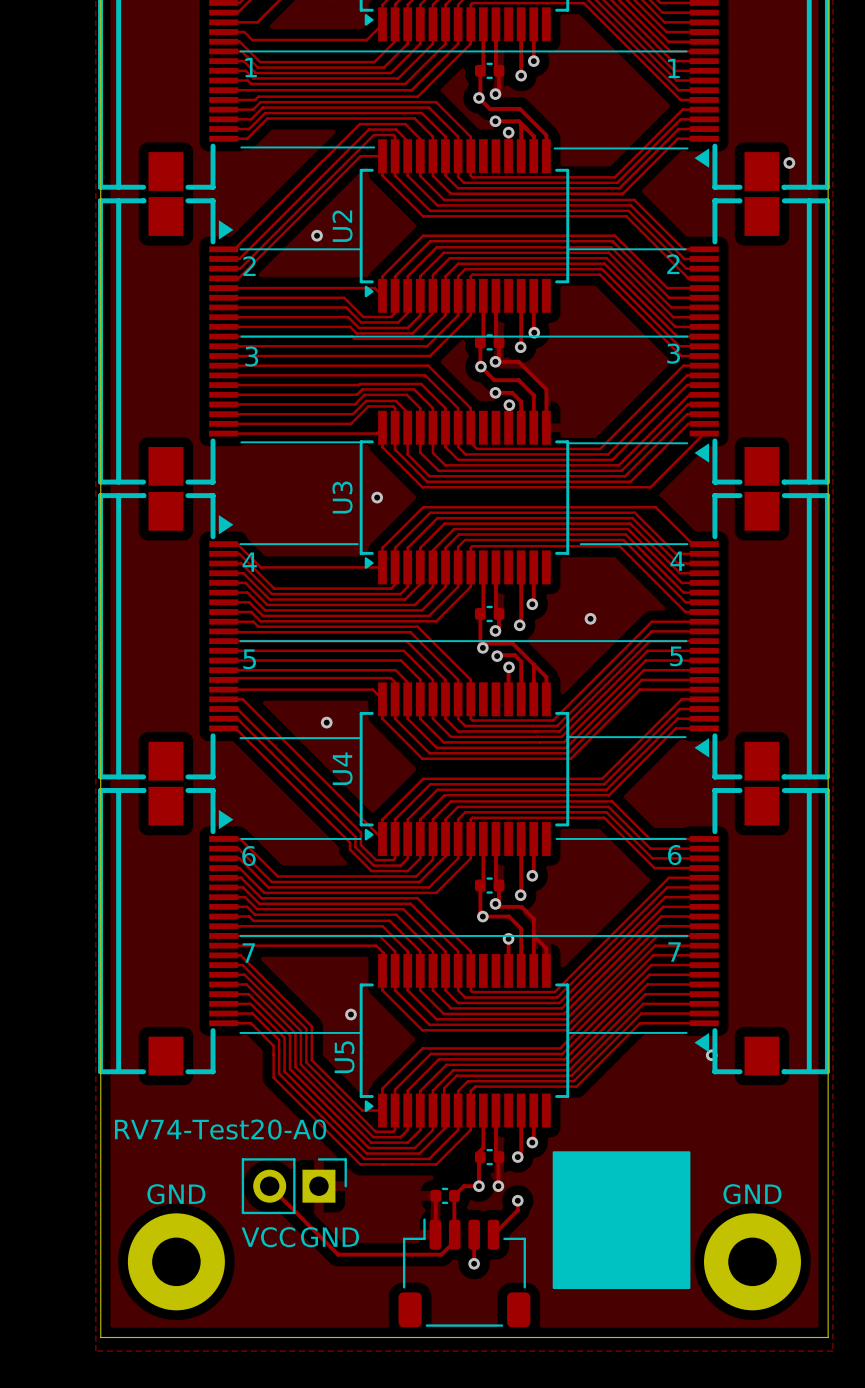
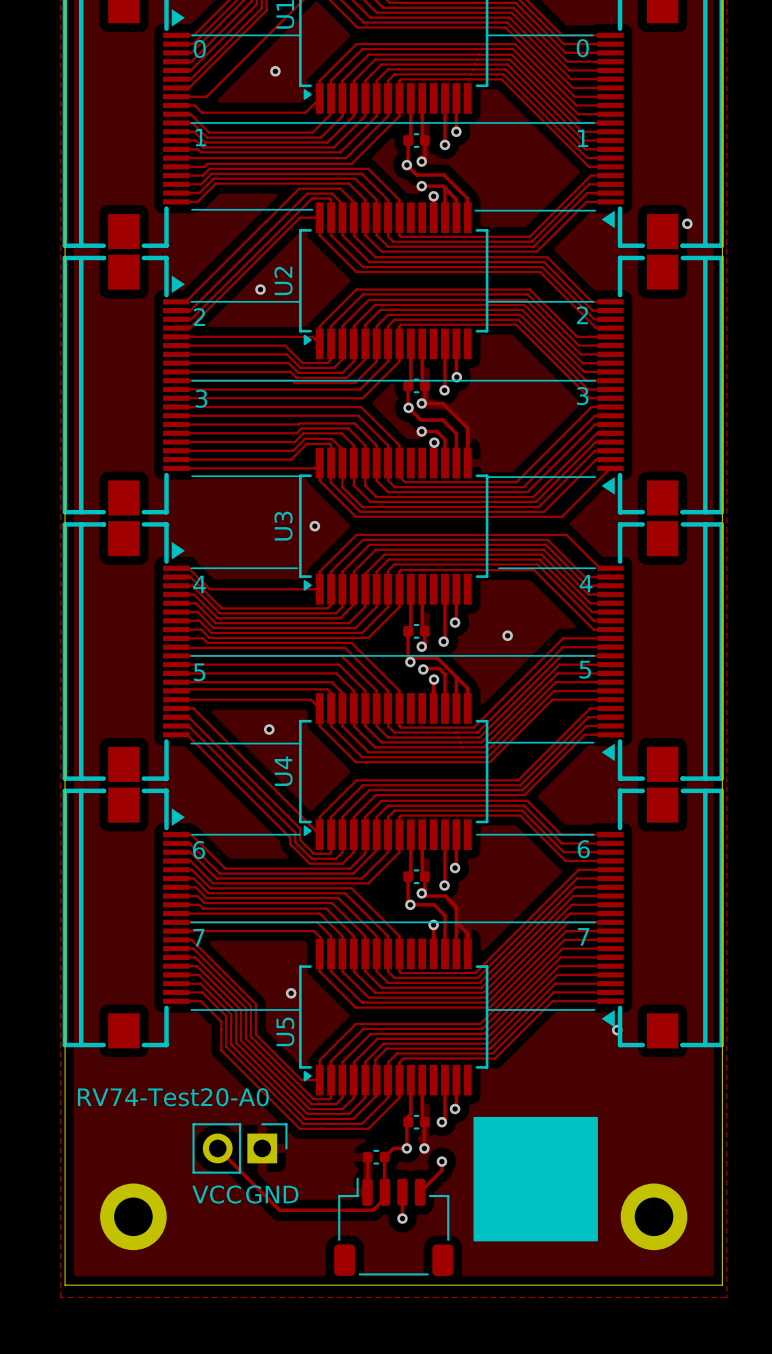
GND: (176, 1261) -> none
part: none -> (133, 1216)
GND: (752, 1261) -> none
part: none -> (654, 1216)

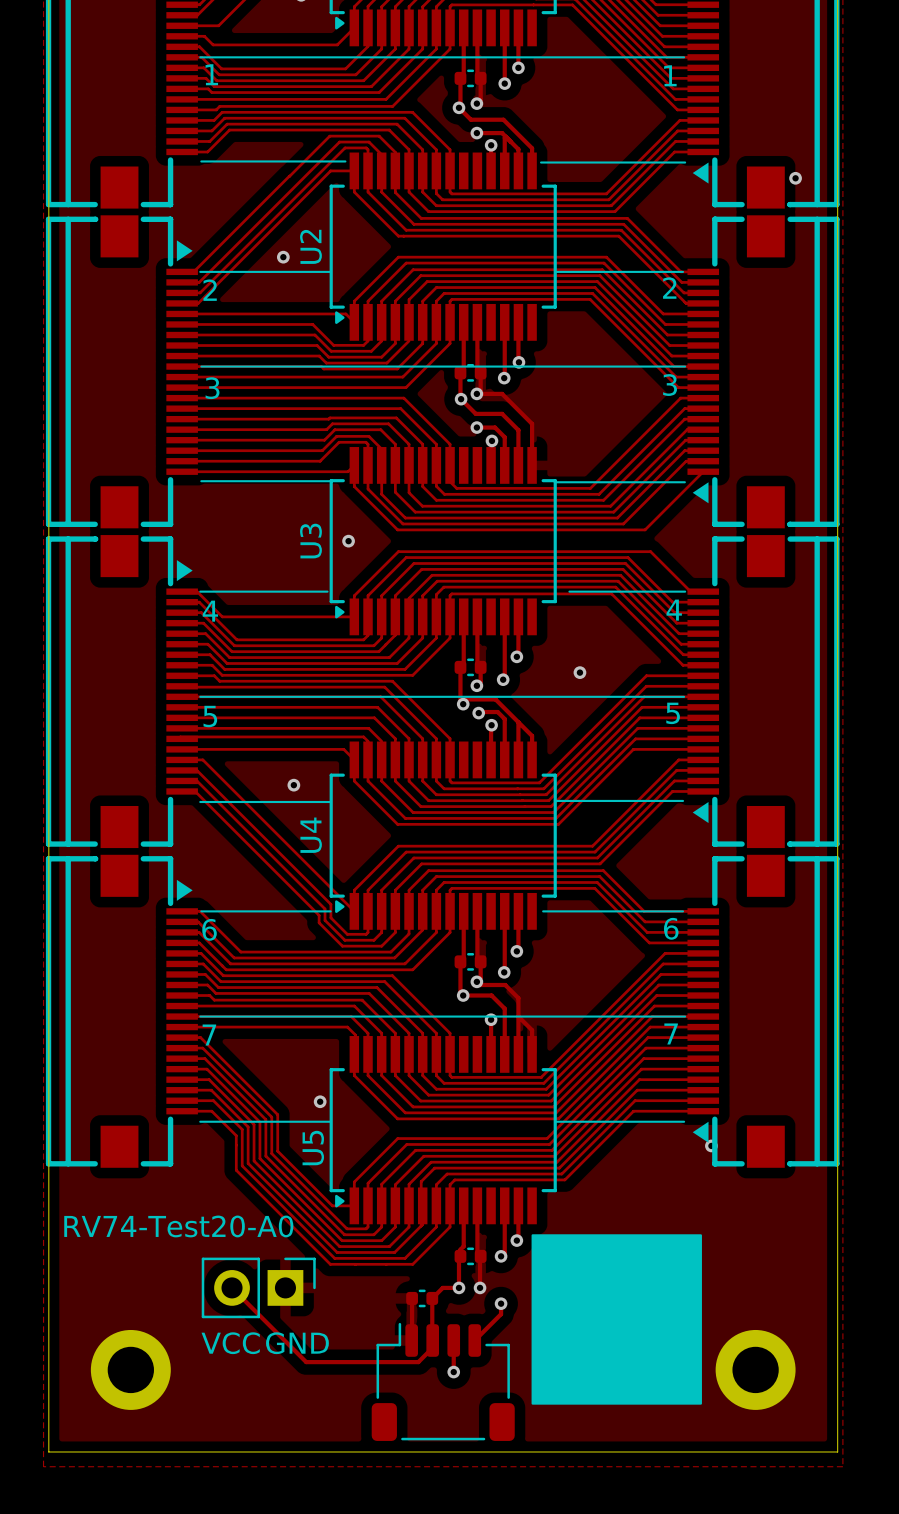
drawing shape: [473, 1116, 598, 1242] -> [531, 1234, 702, 1405]

